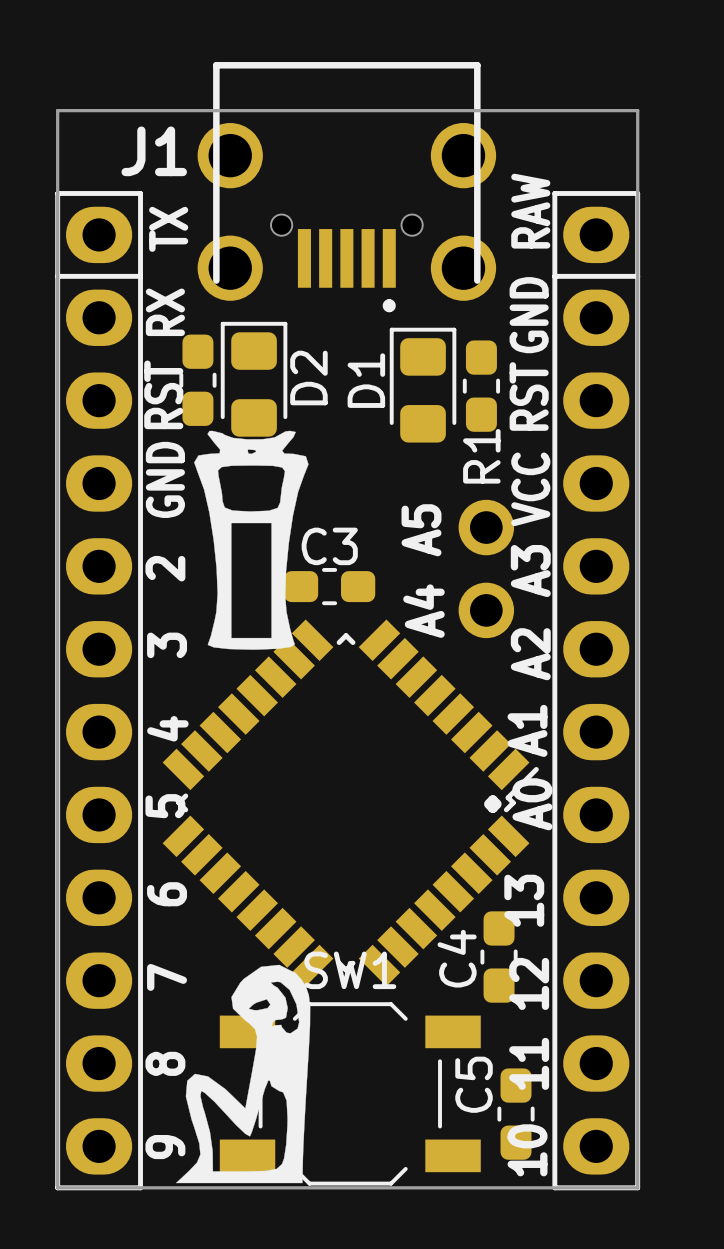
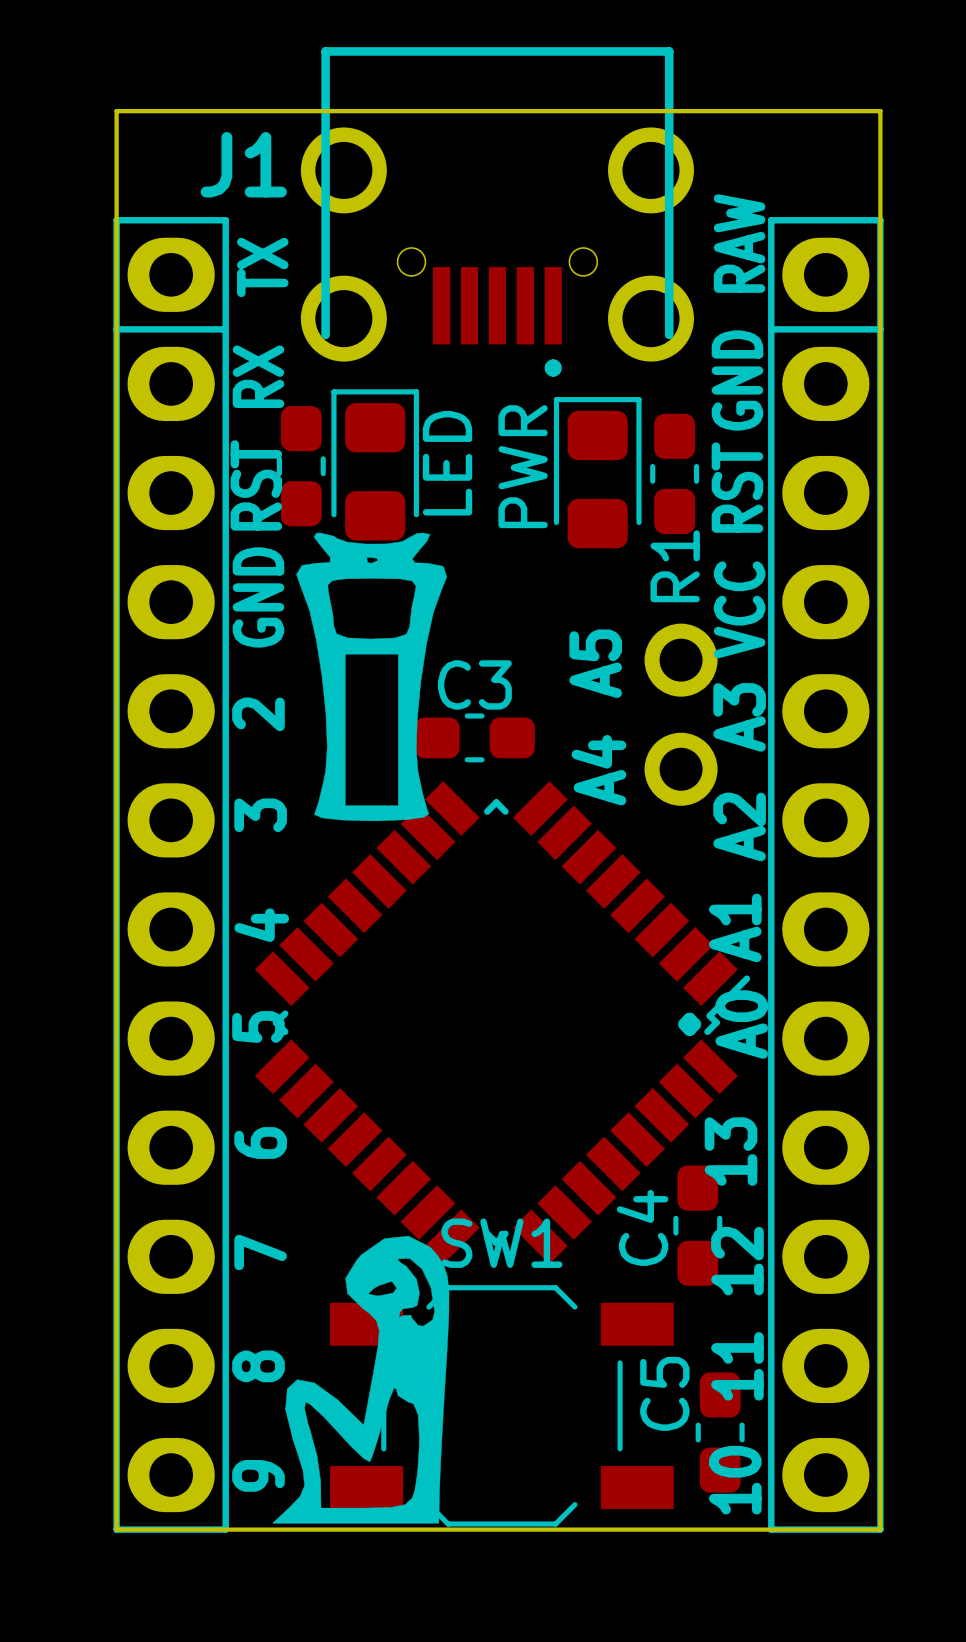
D2 name: D2 (308, 378) -> LED (447, 463)
D1 name: D1 (366, 380) -> PWR (523, 466)

